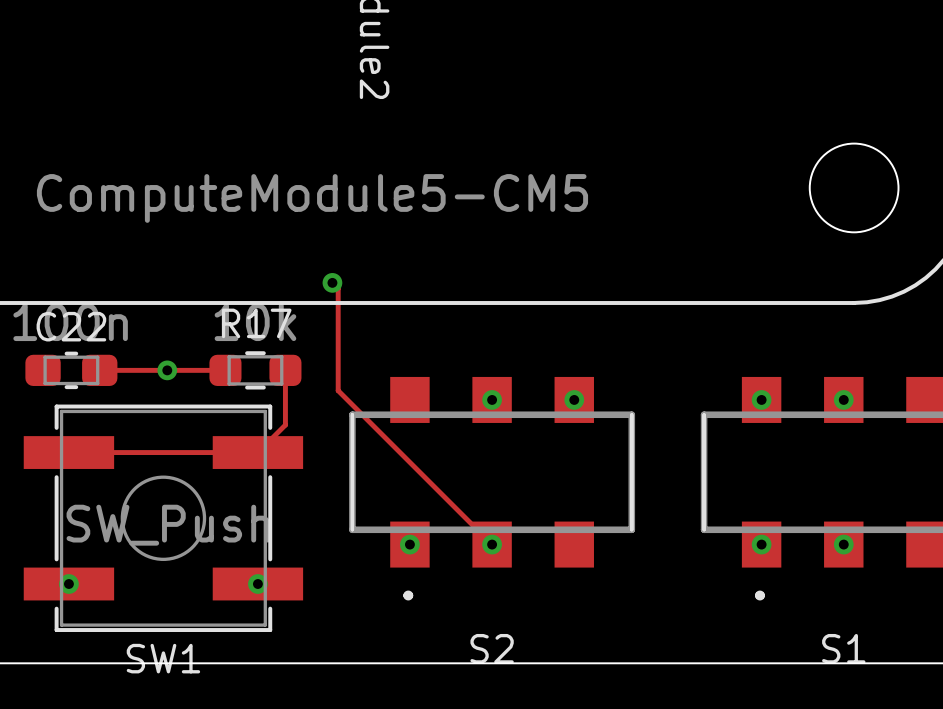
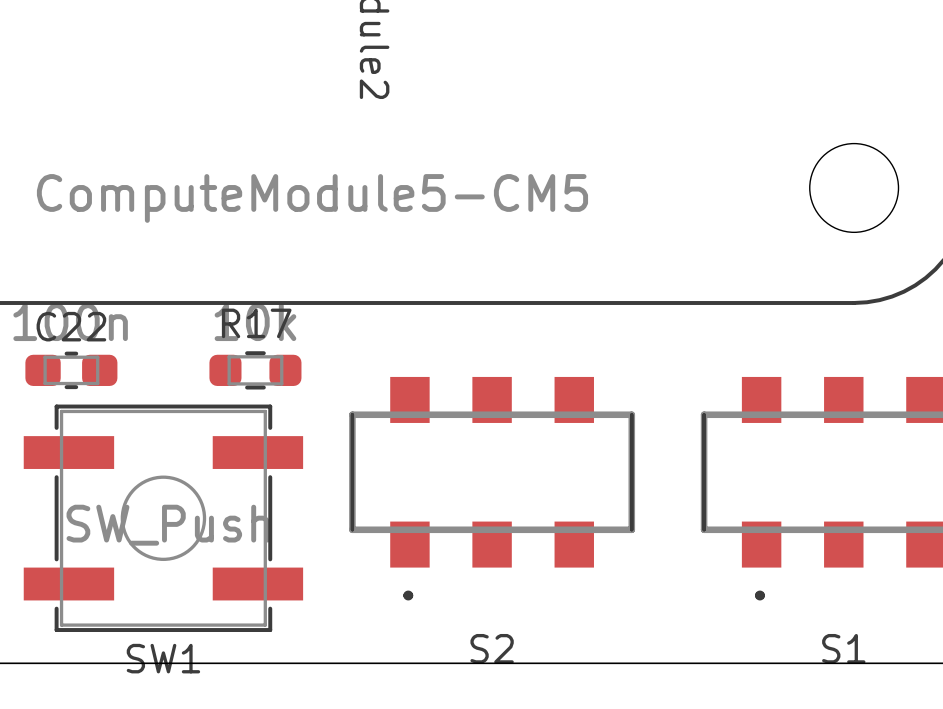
top track: (332, 282) (338, 288) (338, 390) (492, 544) -> none
via: (332, 282) -> none
top track: (99, 370) (225, 370) -> none
via: (167, 370) -> none
top track: (285, 370) (285, 425) (257, 452) (68, 452) -> none
via: (492, 399) -> none
via: (574, 399) -> none
via: (761, 399) -> none
via: (843, 399) -> none
via: (409, 544) -> none
via: (492, 544) -> none
via: (761, 544) -> none
via: (843, 544) -> none
via: (68, 584) -> none
via: (257, 584) -> none

